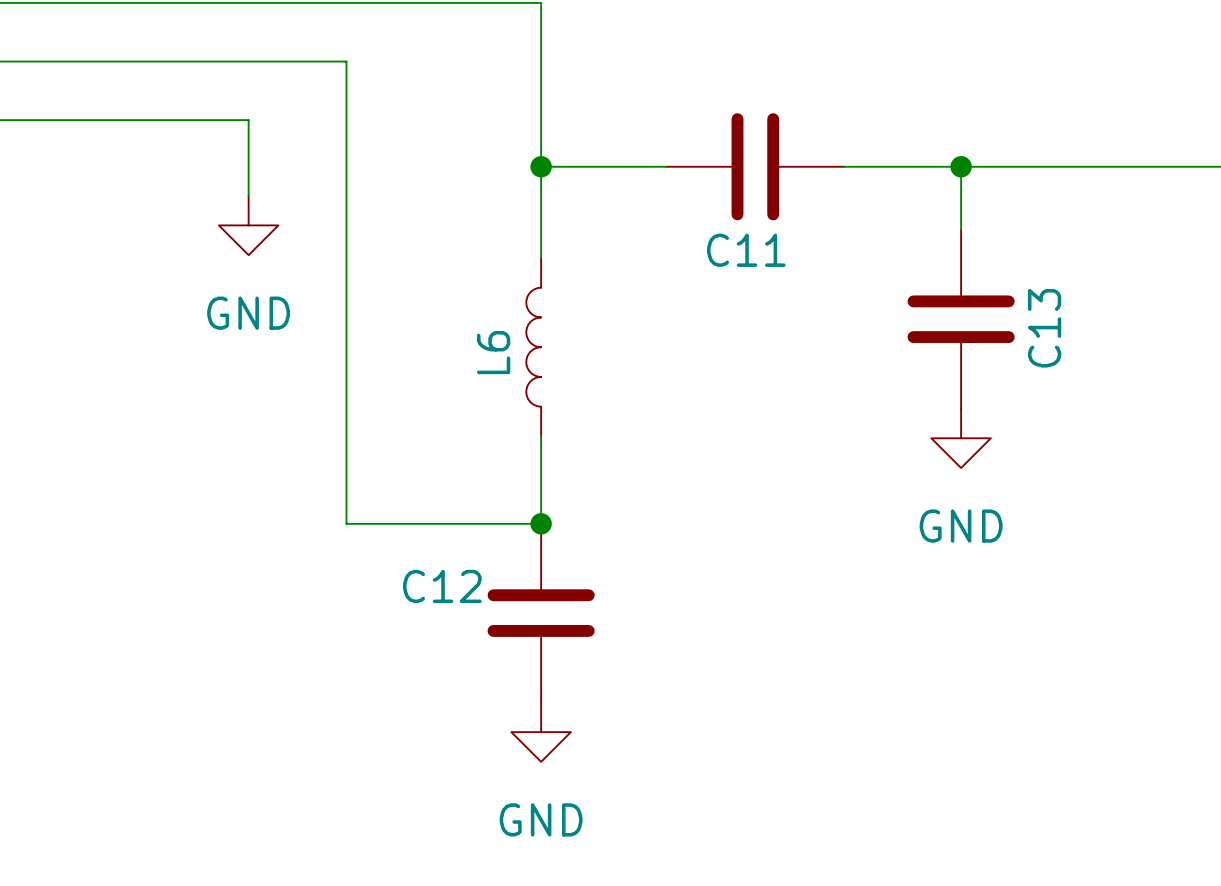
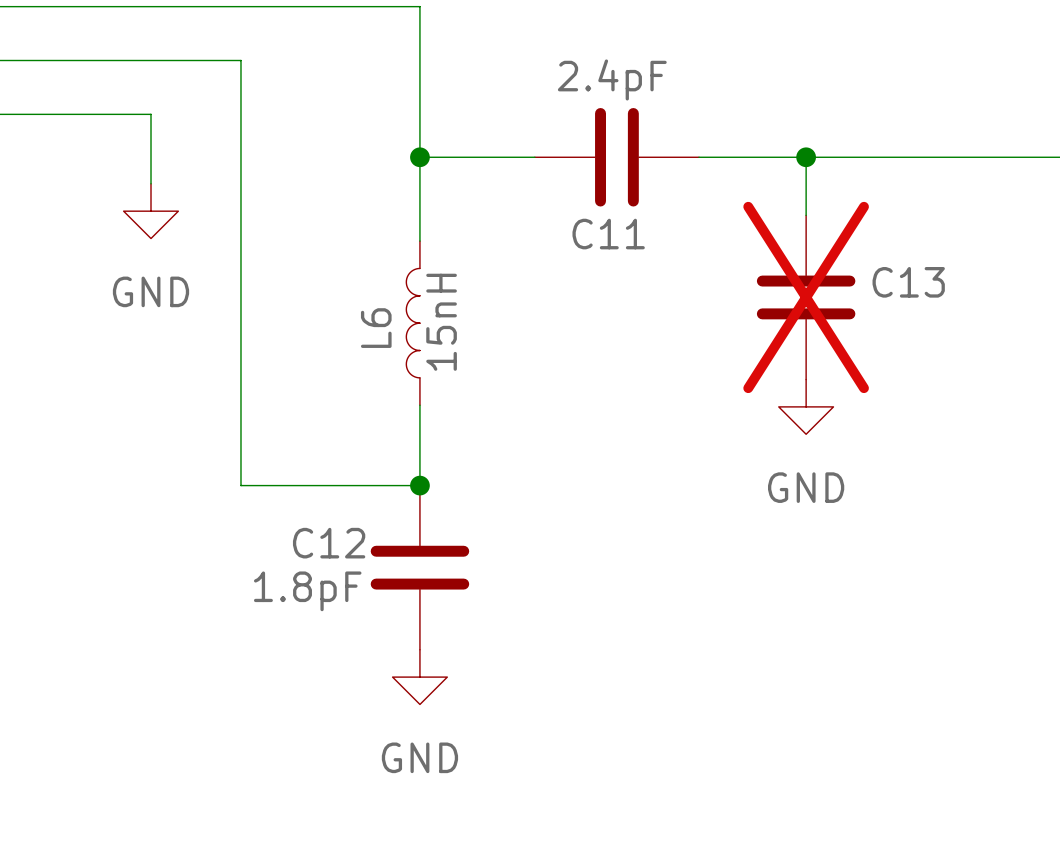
C11 value: none -> 2.4pF (612, 79)
C13 do-not-place cross: none -> (806, 297)
C13 name rotation: 0° (1044, 328) -> 90° clockwise (908, 282)
L6 value: none -> 15nH (441, 322)
C12 value: none -> 1.8pF (307, 591)

